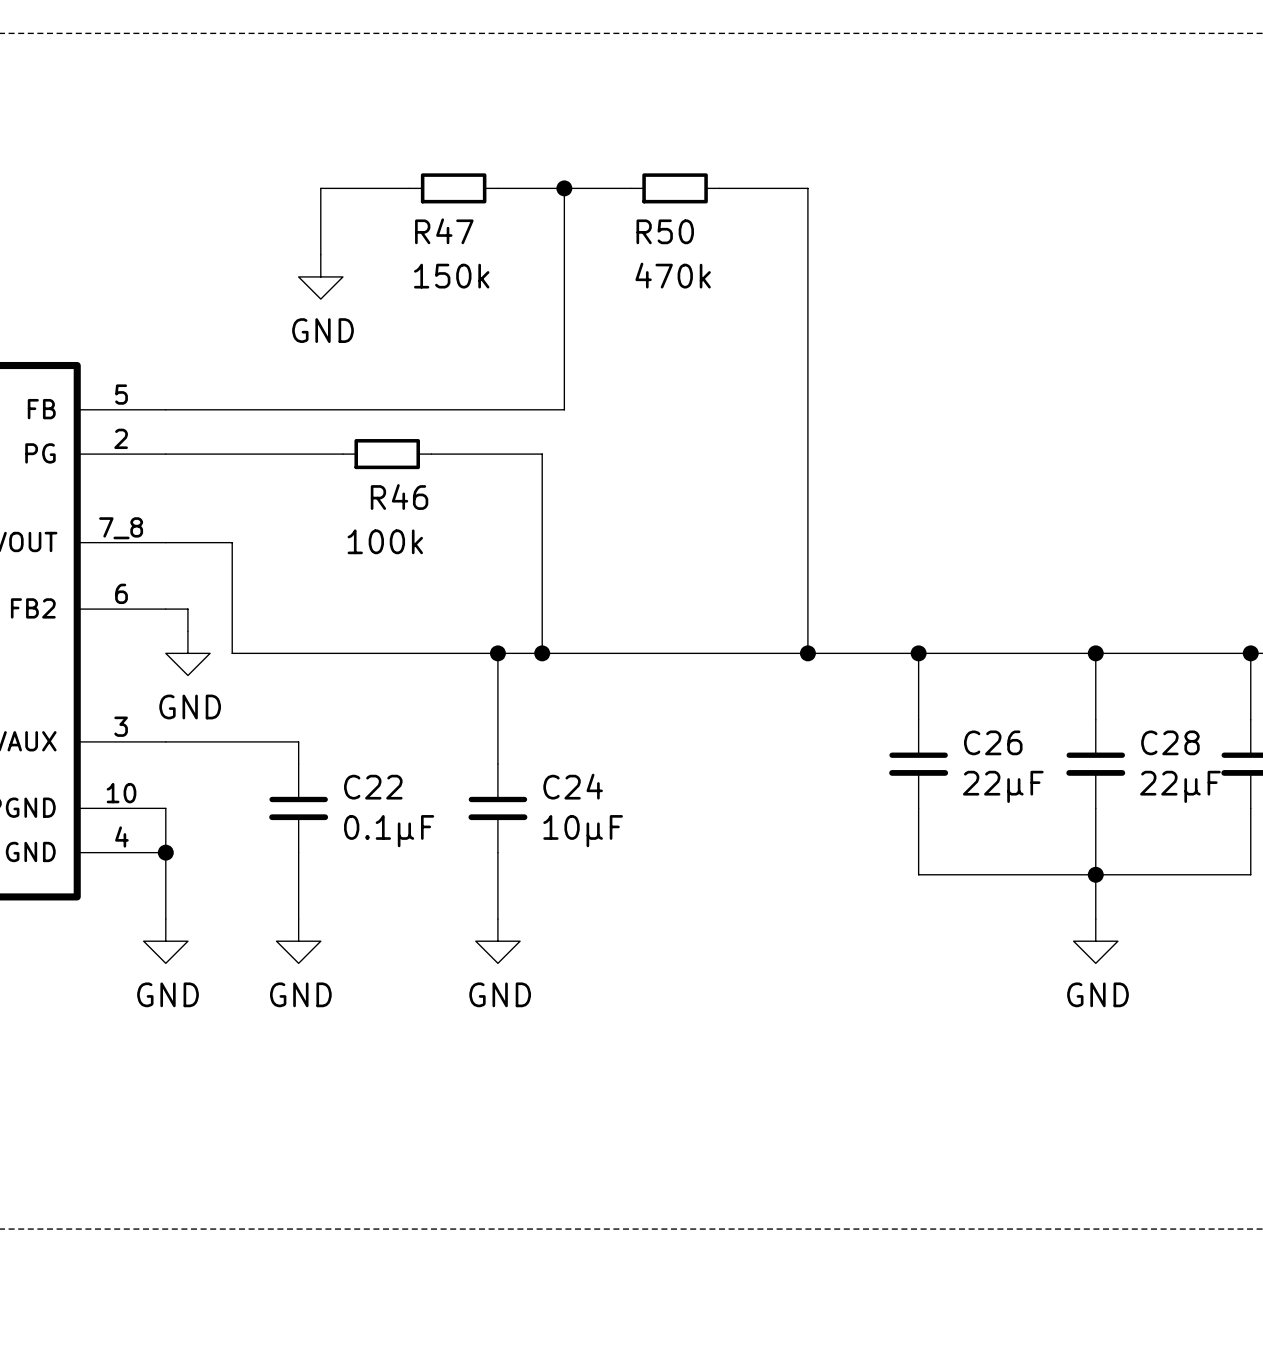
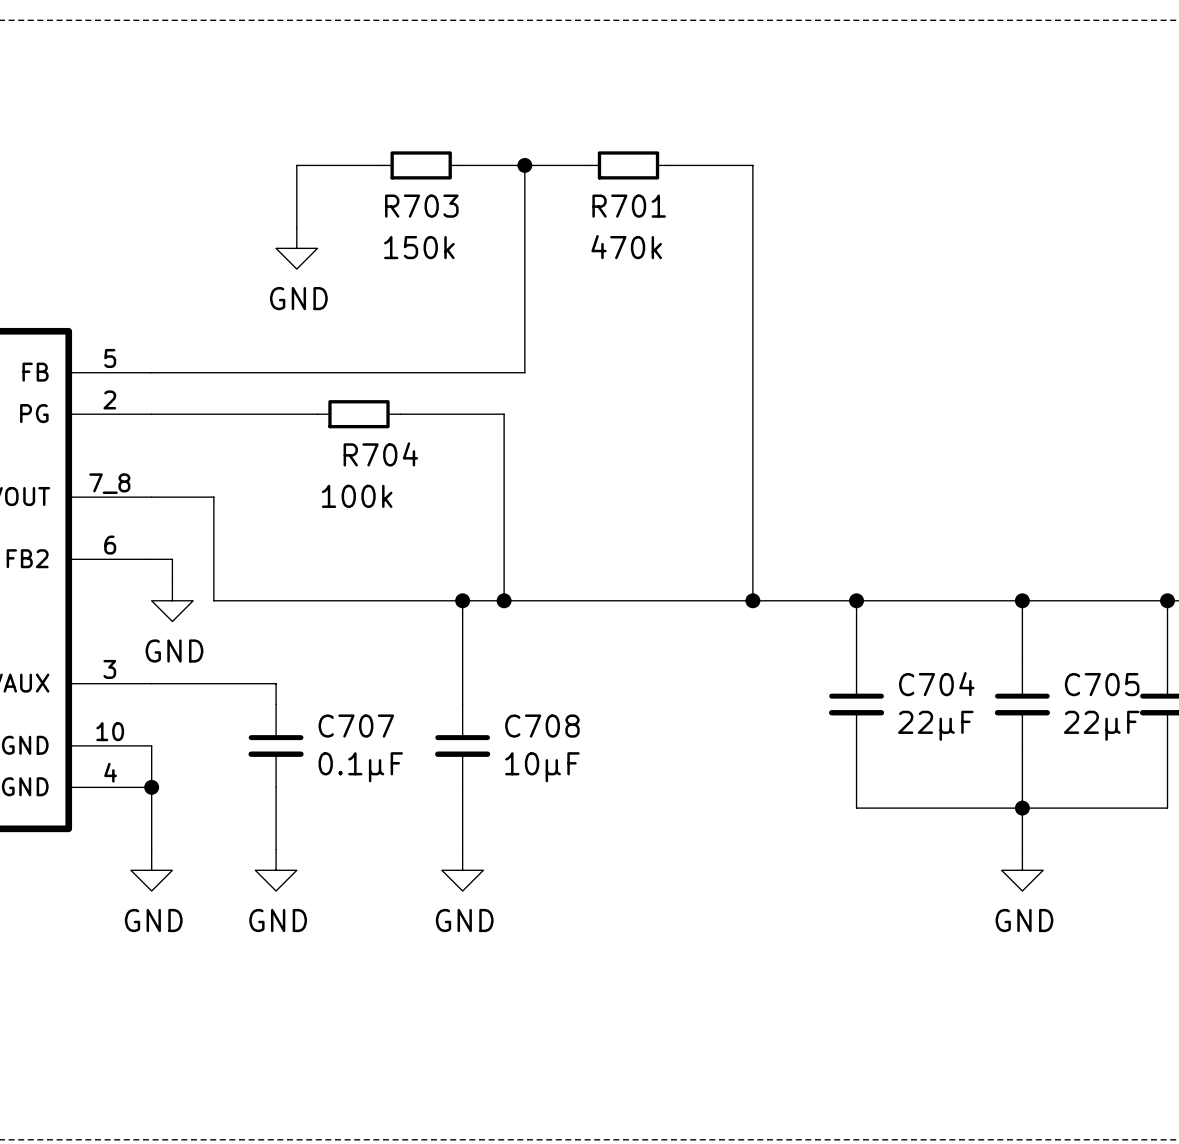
R47 name: R47 (444, 231) -> R703 (421, 206)
R50 name: R50 (665, 231) -> R701 (629, 206)
R46 name: R46 (399, 497) -> R704 (380, 454)
C26 name: C26 (993, 742) -> C704 (936, 684)
C28 name: C28 (1170, 742) -> C705 (1102, 684)
C24 name: C24 (573, 786) -> C708 (542, 726)
C22 name: C22 (373, 787) -> C707 (356, 726)

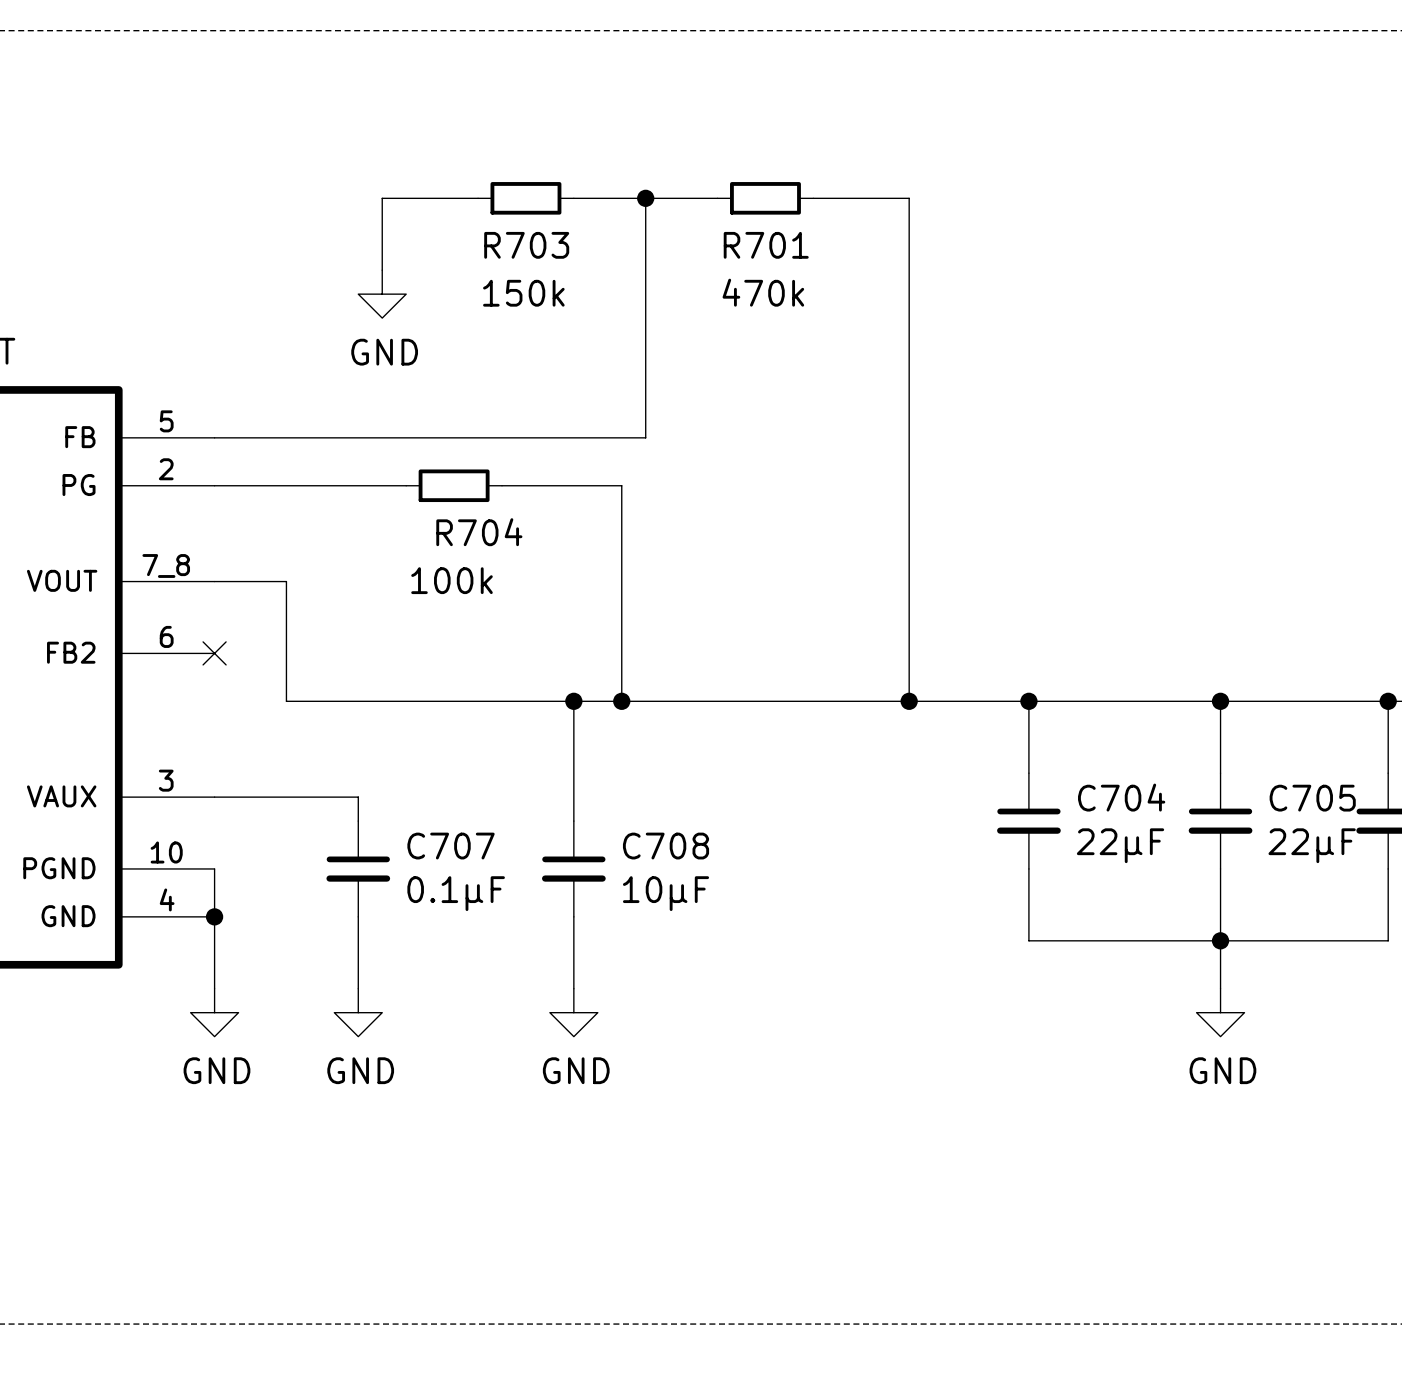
wire: (151, 559) (172, 559) (172, 580) -> none
no-connect mark: none -> (214, 653)
power symbol: GND (172, 600) -> none

